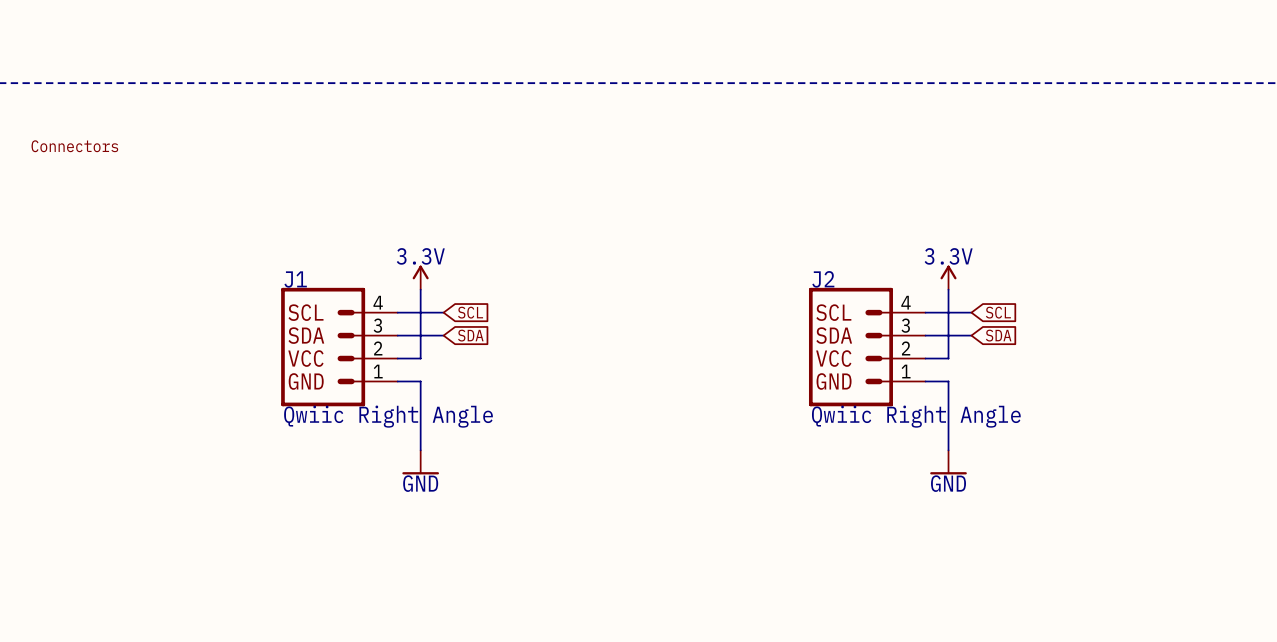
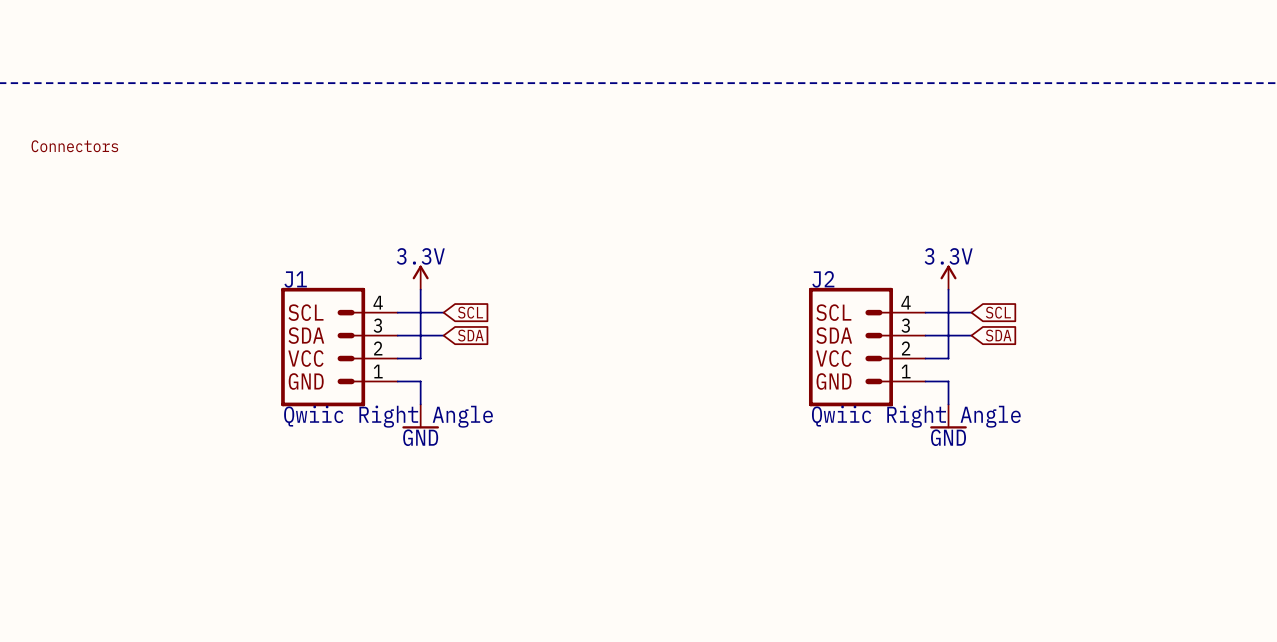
power symbol position: GND (420, 462) -> GND (420, 416)
power symbol position: GND (948, 462) -> GND (948, 416)

